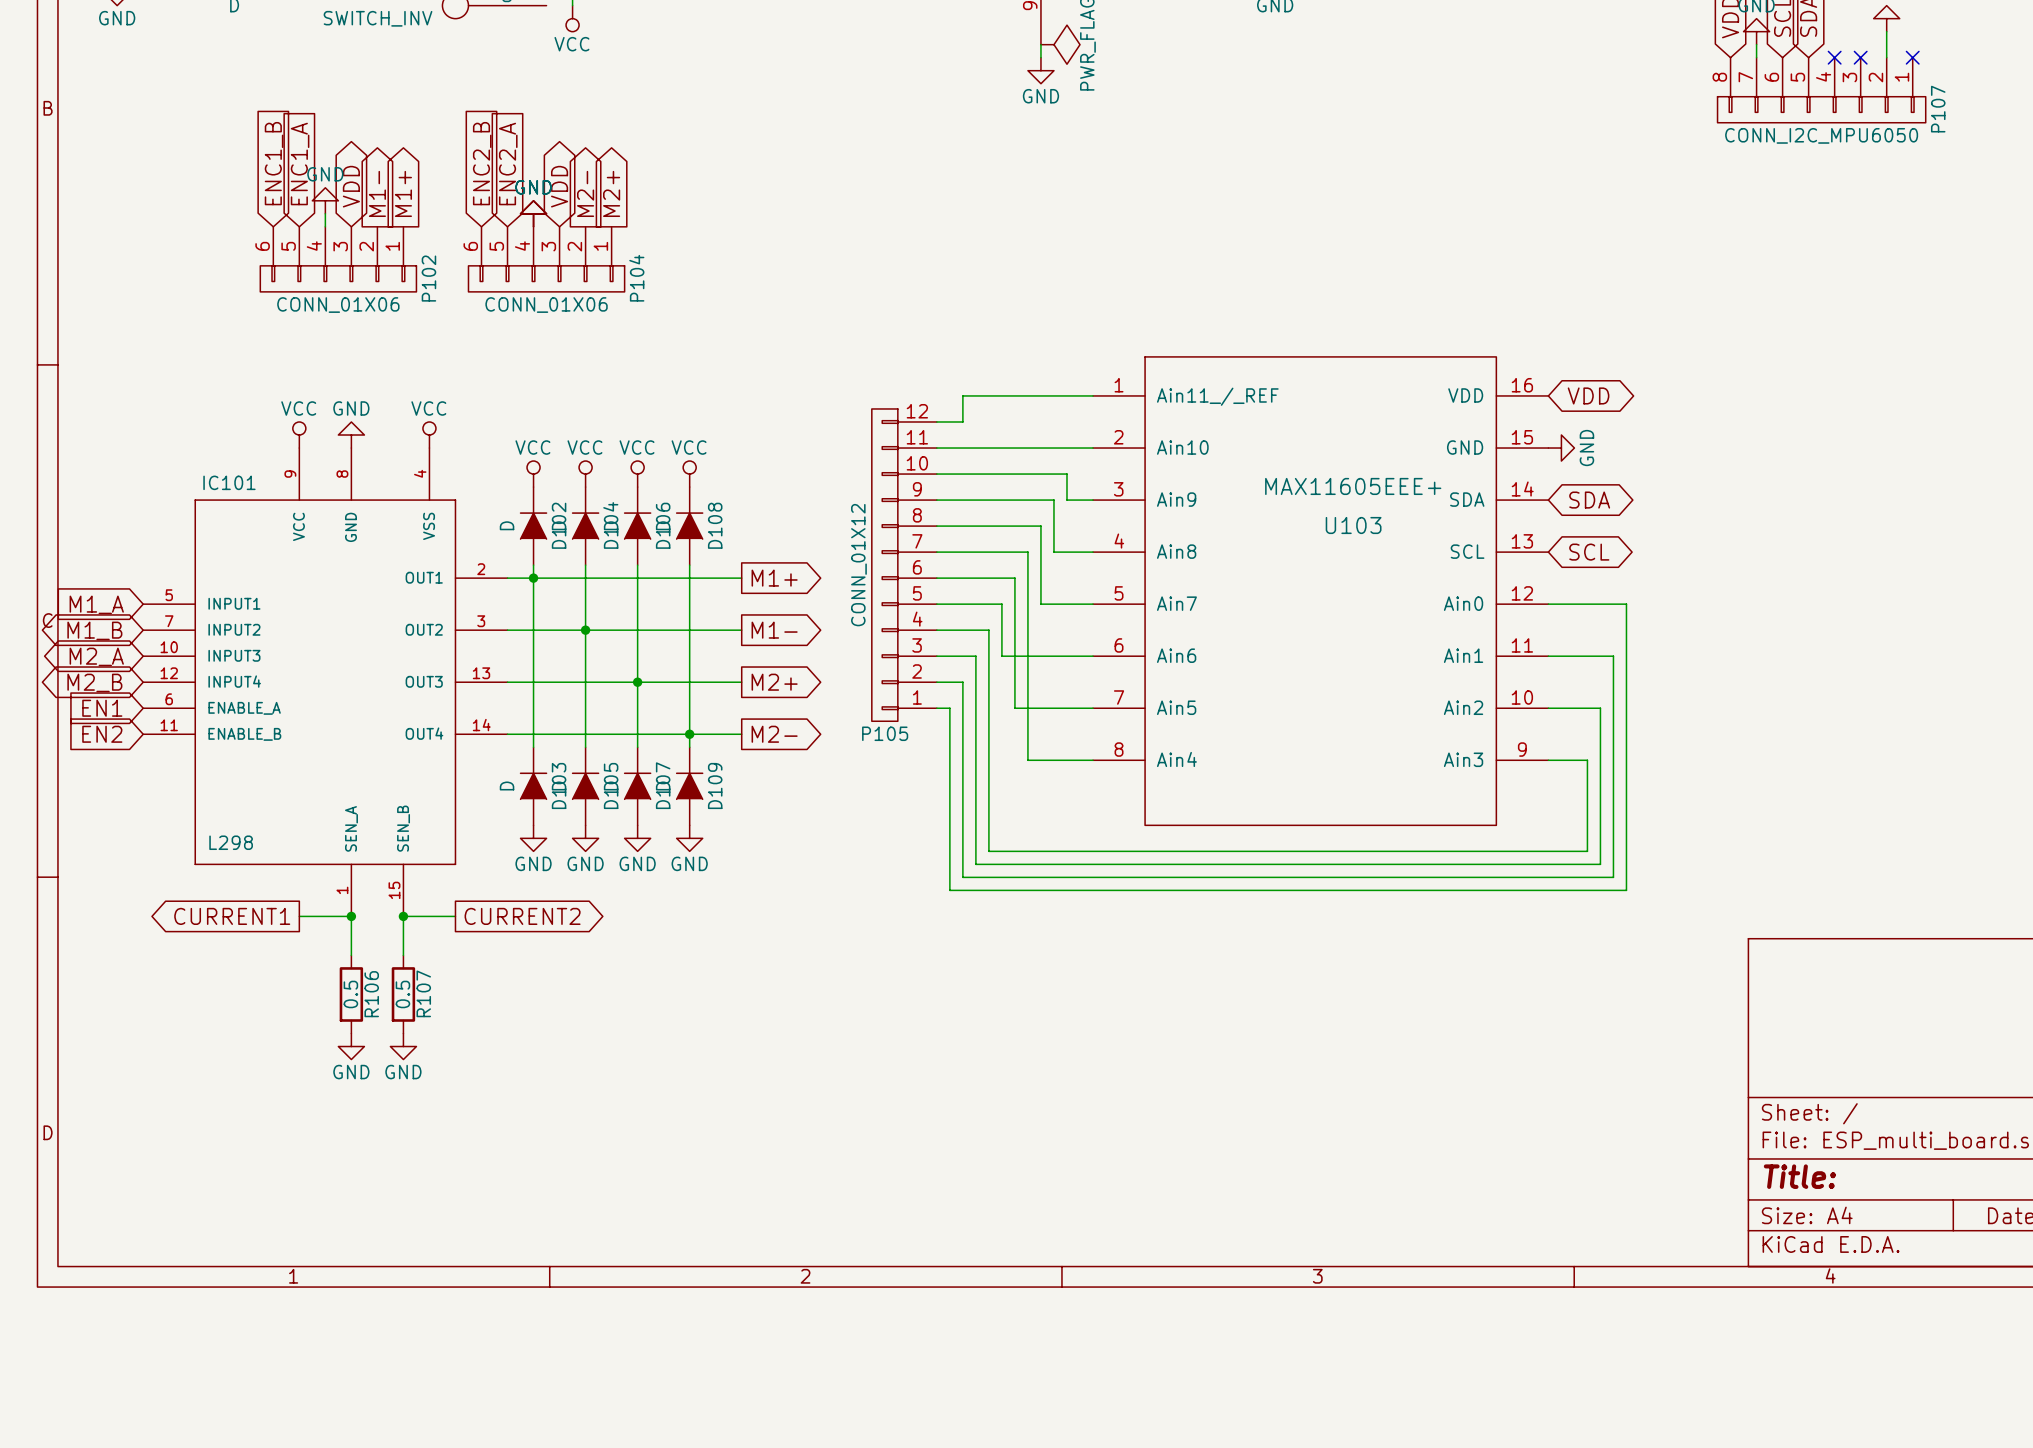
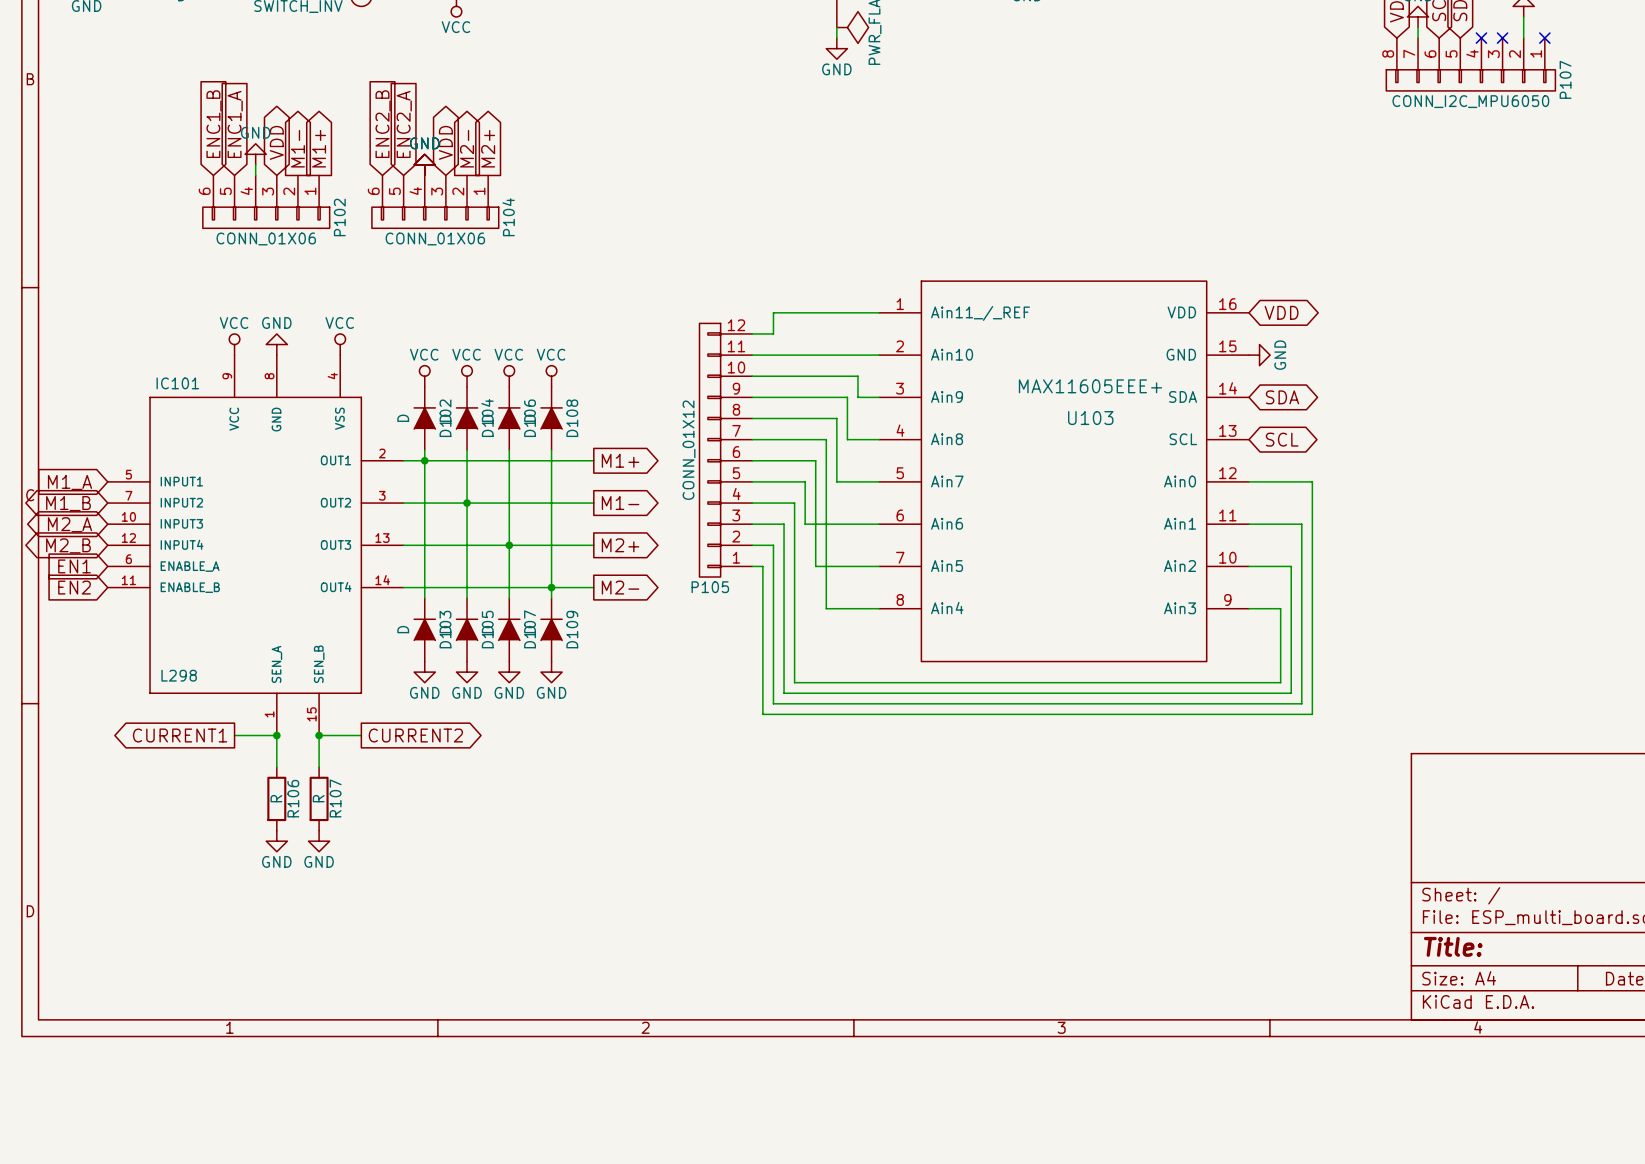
R106 value: 0.5 (350, 994) -> R (276, 798)
R107 value: 0.5 (402, 994) -> R (318, 798)

